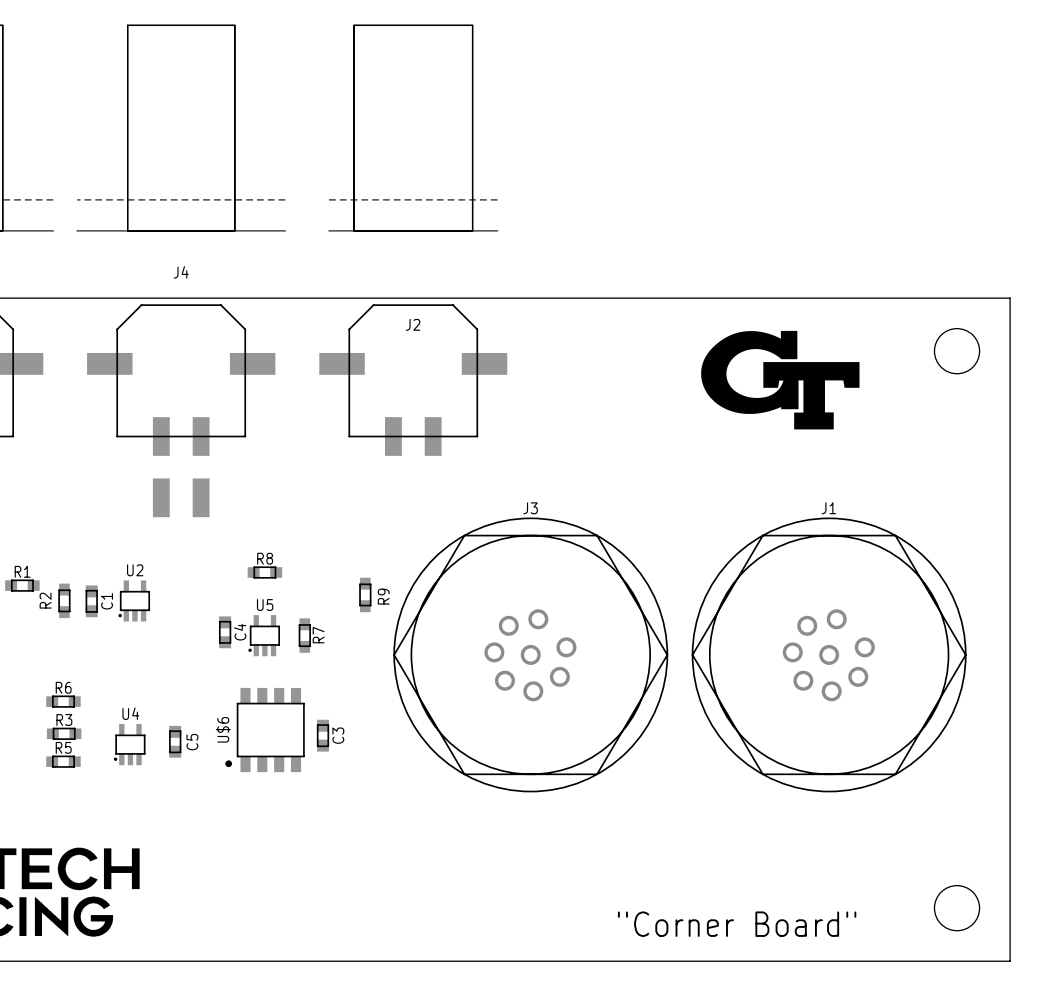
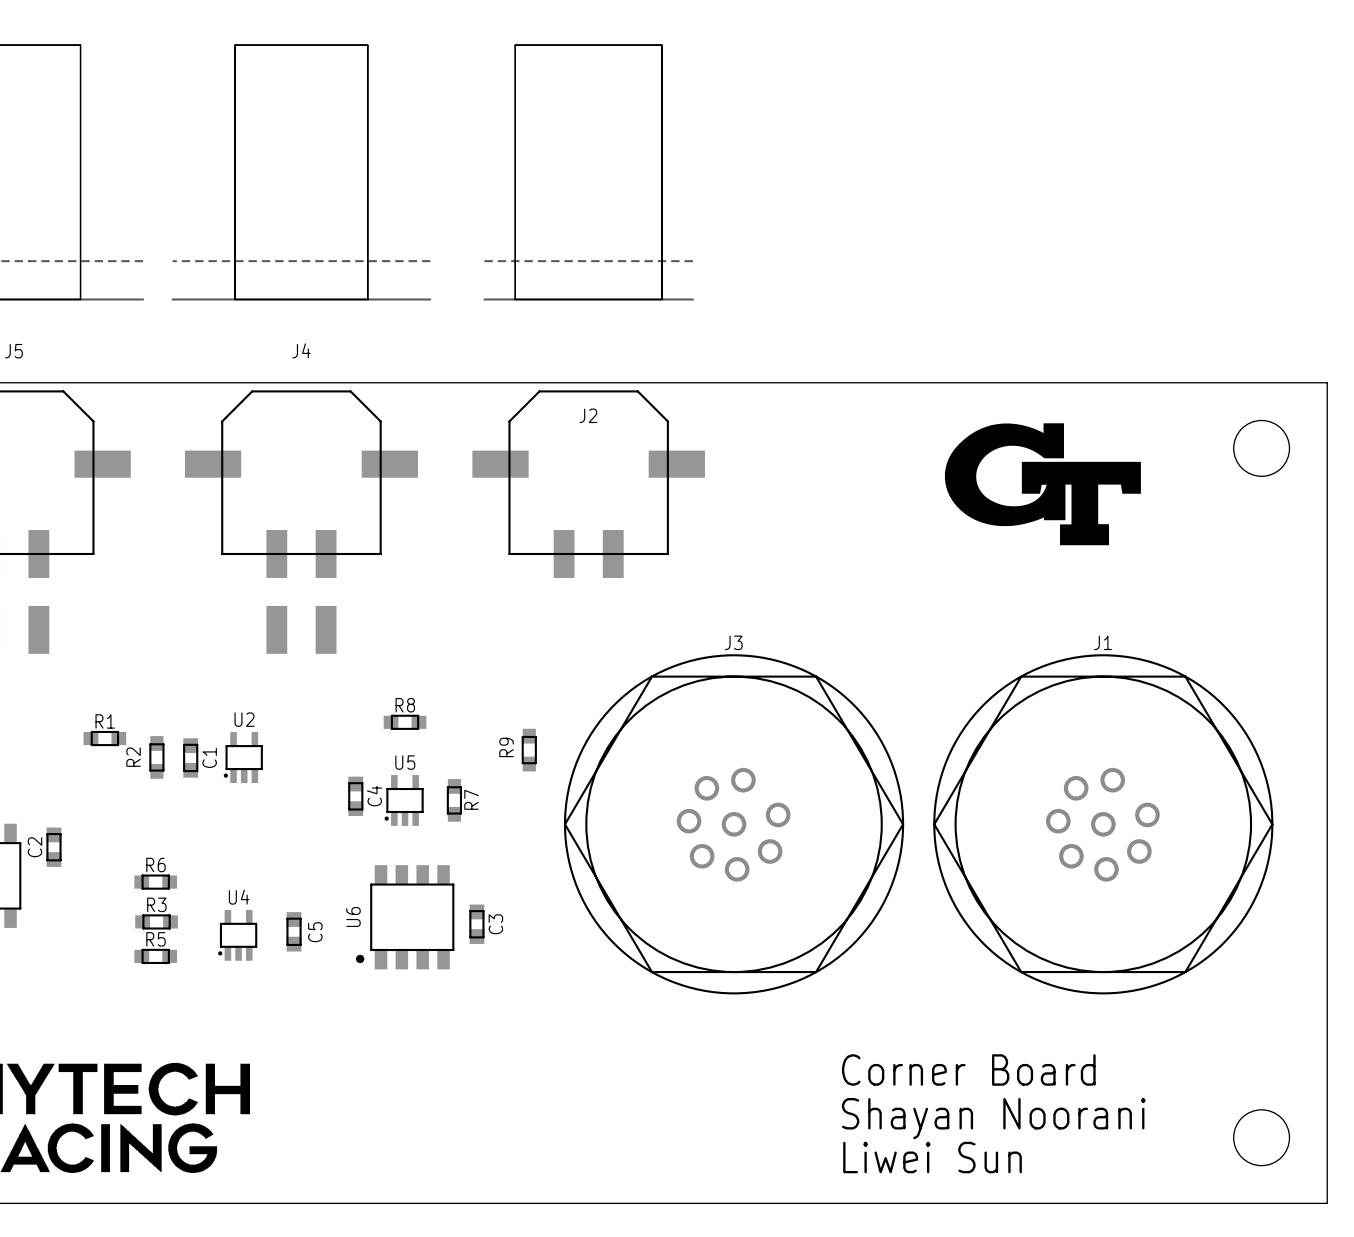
R9 name position: R9 (383, 596) -> R9 (506, 747)
U$6 name: U$6 (223, 729) -> U6 (353, 916)
text: none -> Corner Board (968, 1069)
text: none -> Shayan Noorani (993, 1118)
text: "Corner Board" (737, 924) -> Liwei Sun (932, 1157)

